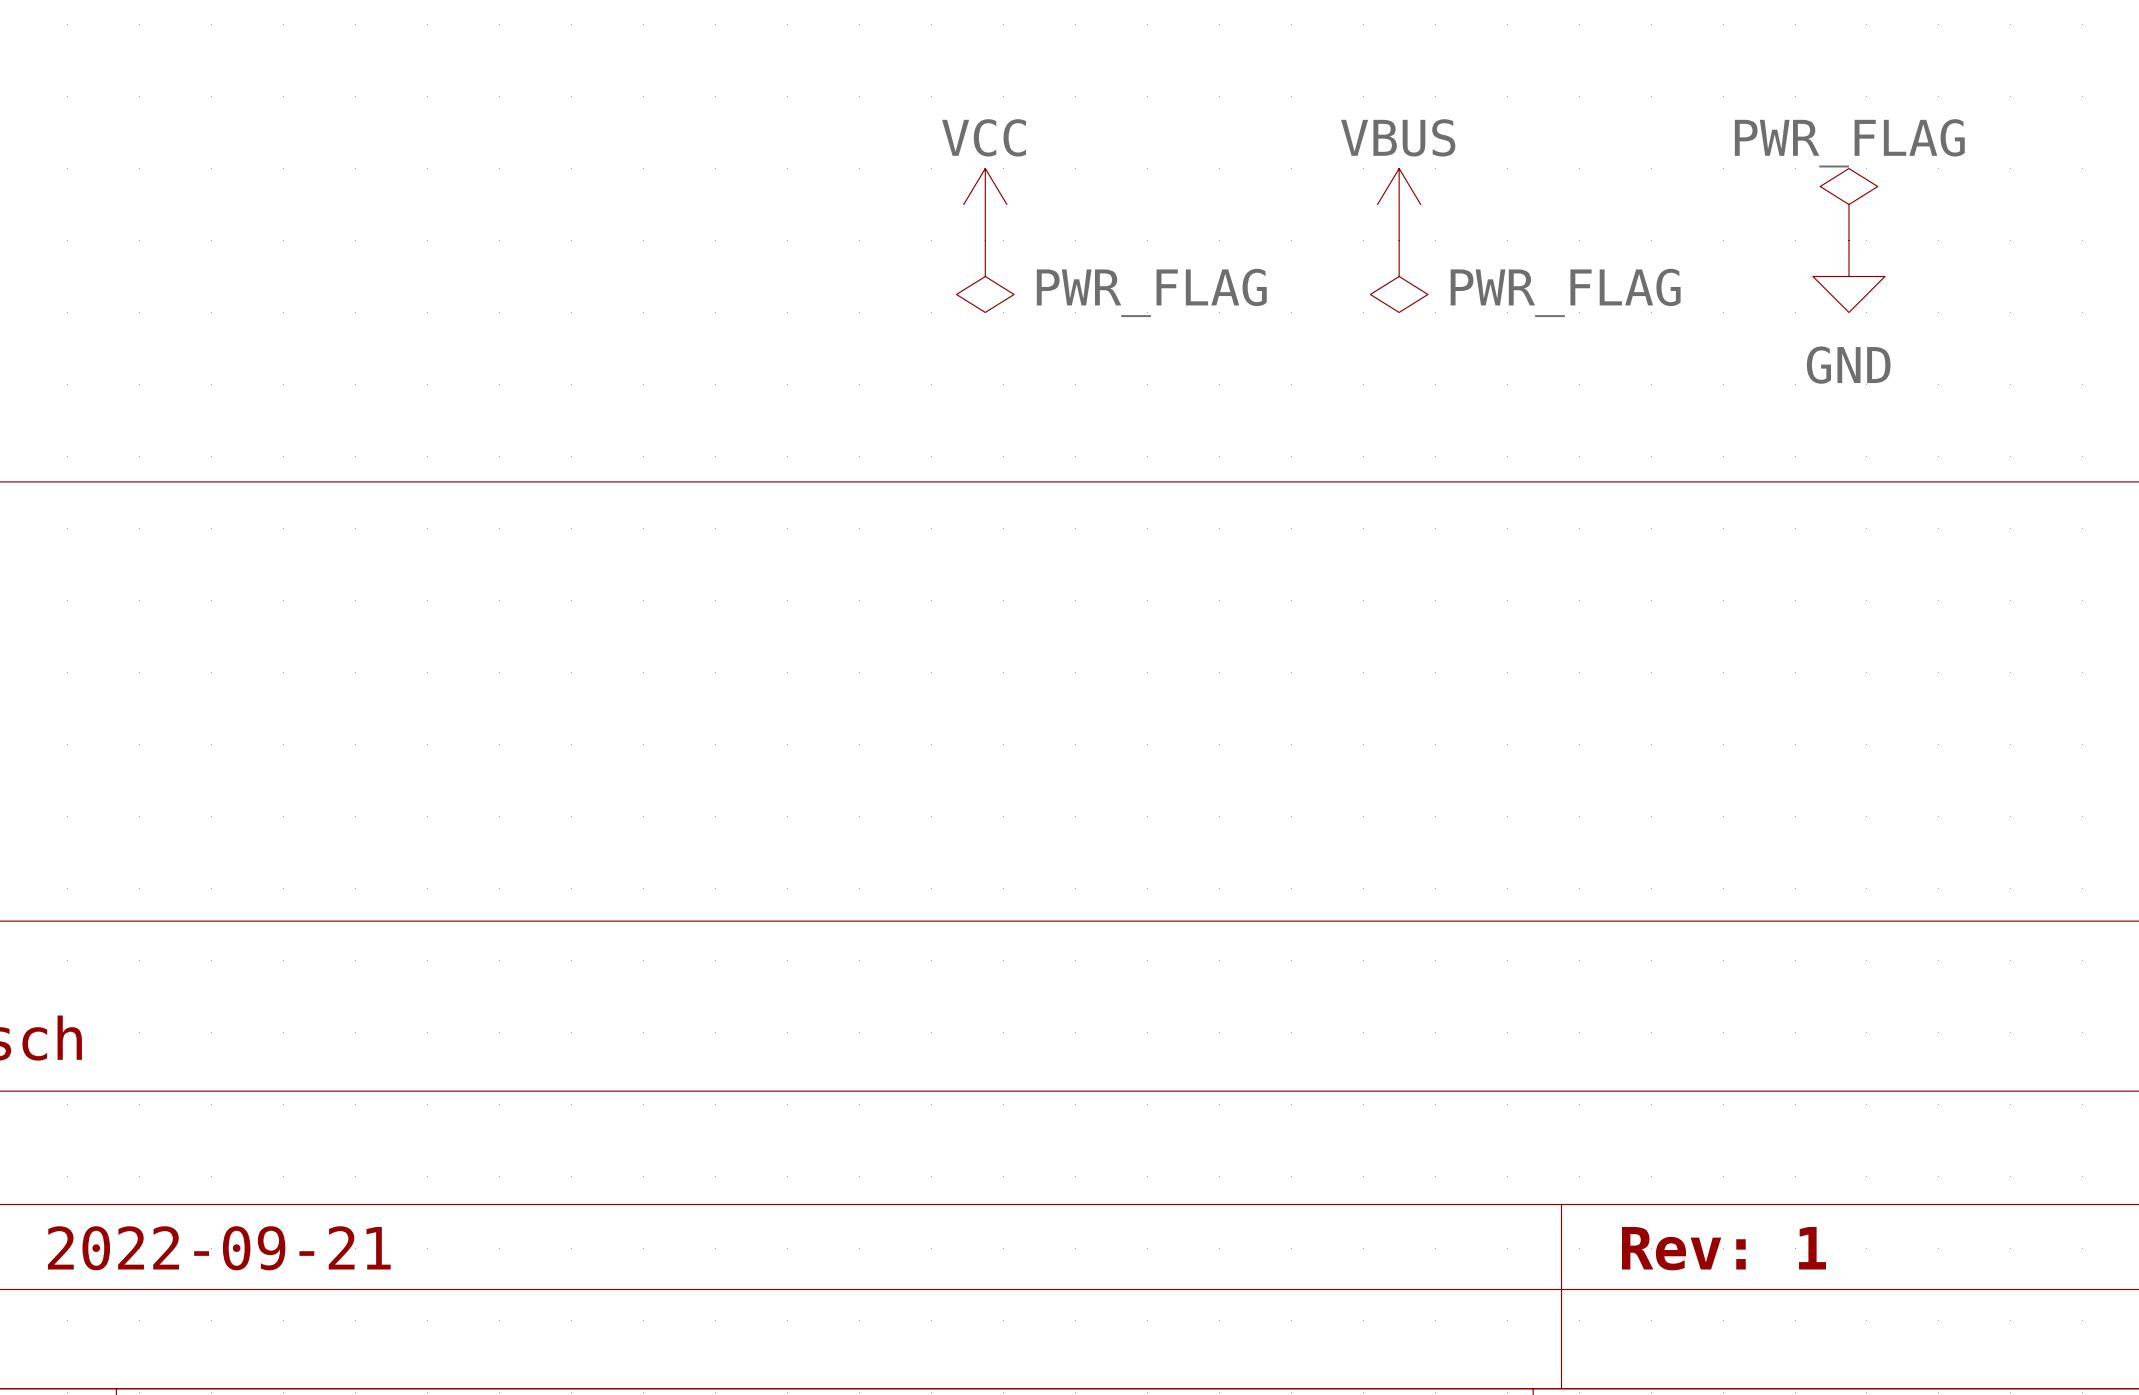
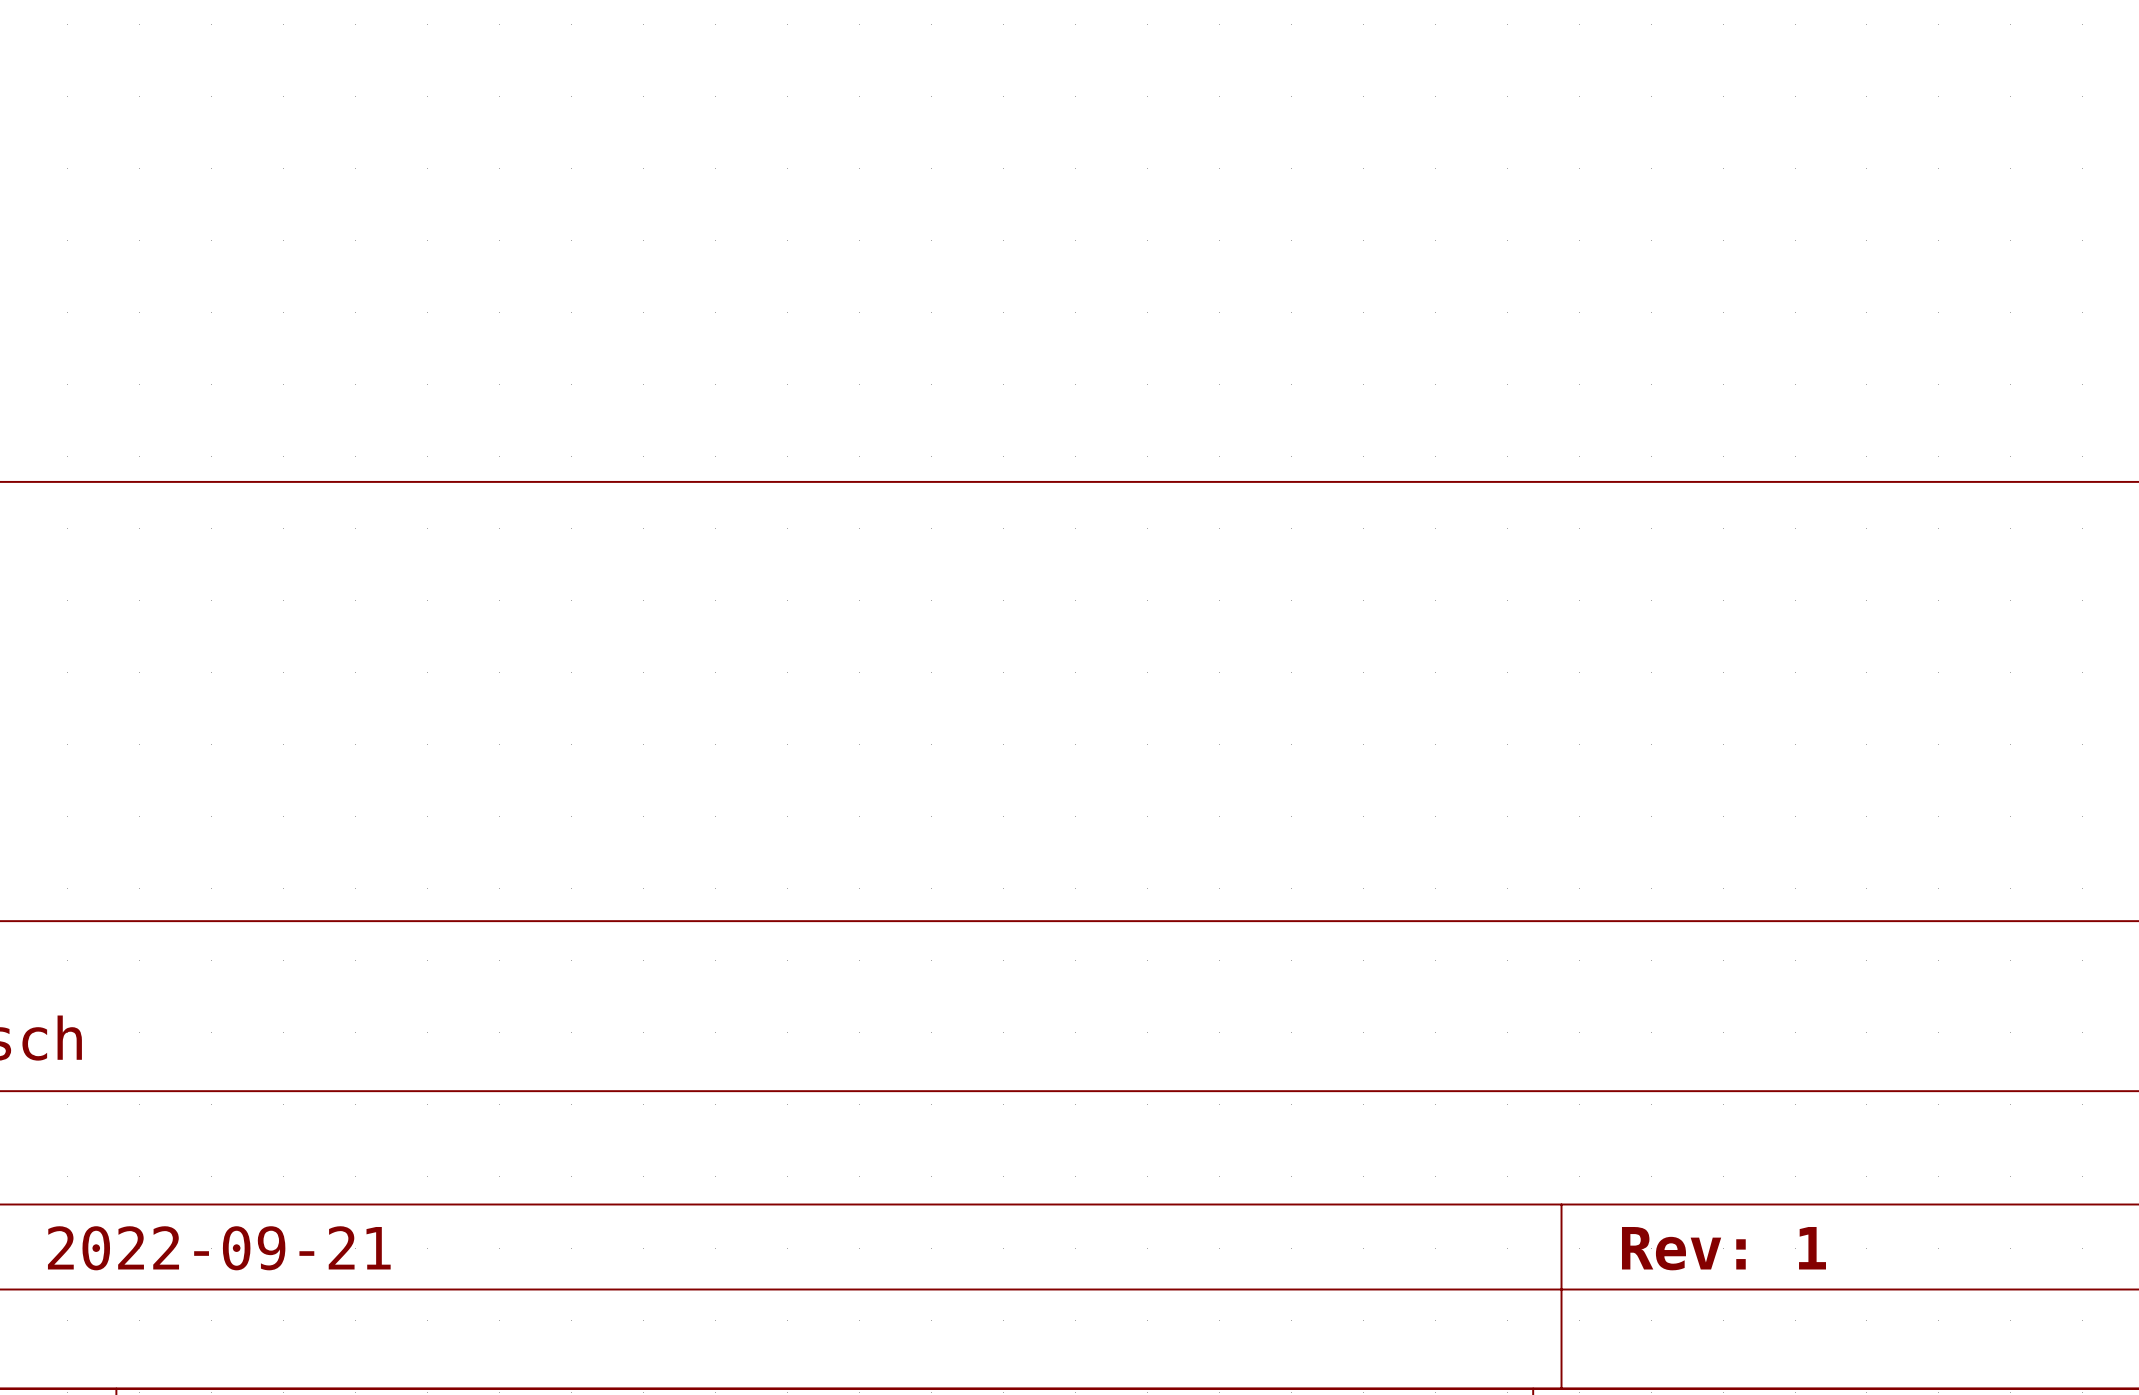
power symbol: VCC (985, 204) -> none
power symbol: VBUS (1399, 204) -> none
power symbol: PWR_FLAG (1848, 204) -> none
power symbol: PWR_FLAG (985, 276) -> none
power symbol: PWR_FLAG (1399, 276) -> none
power symbol: GND (1848, 276) -> none

